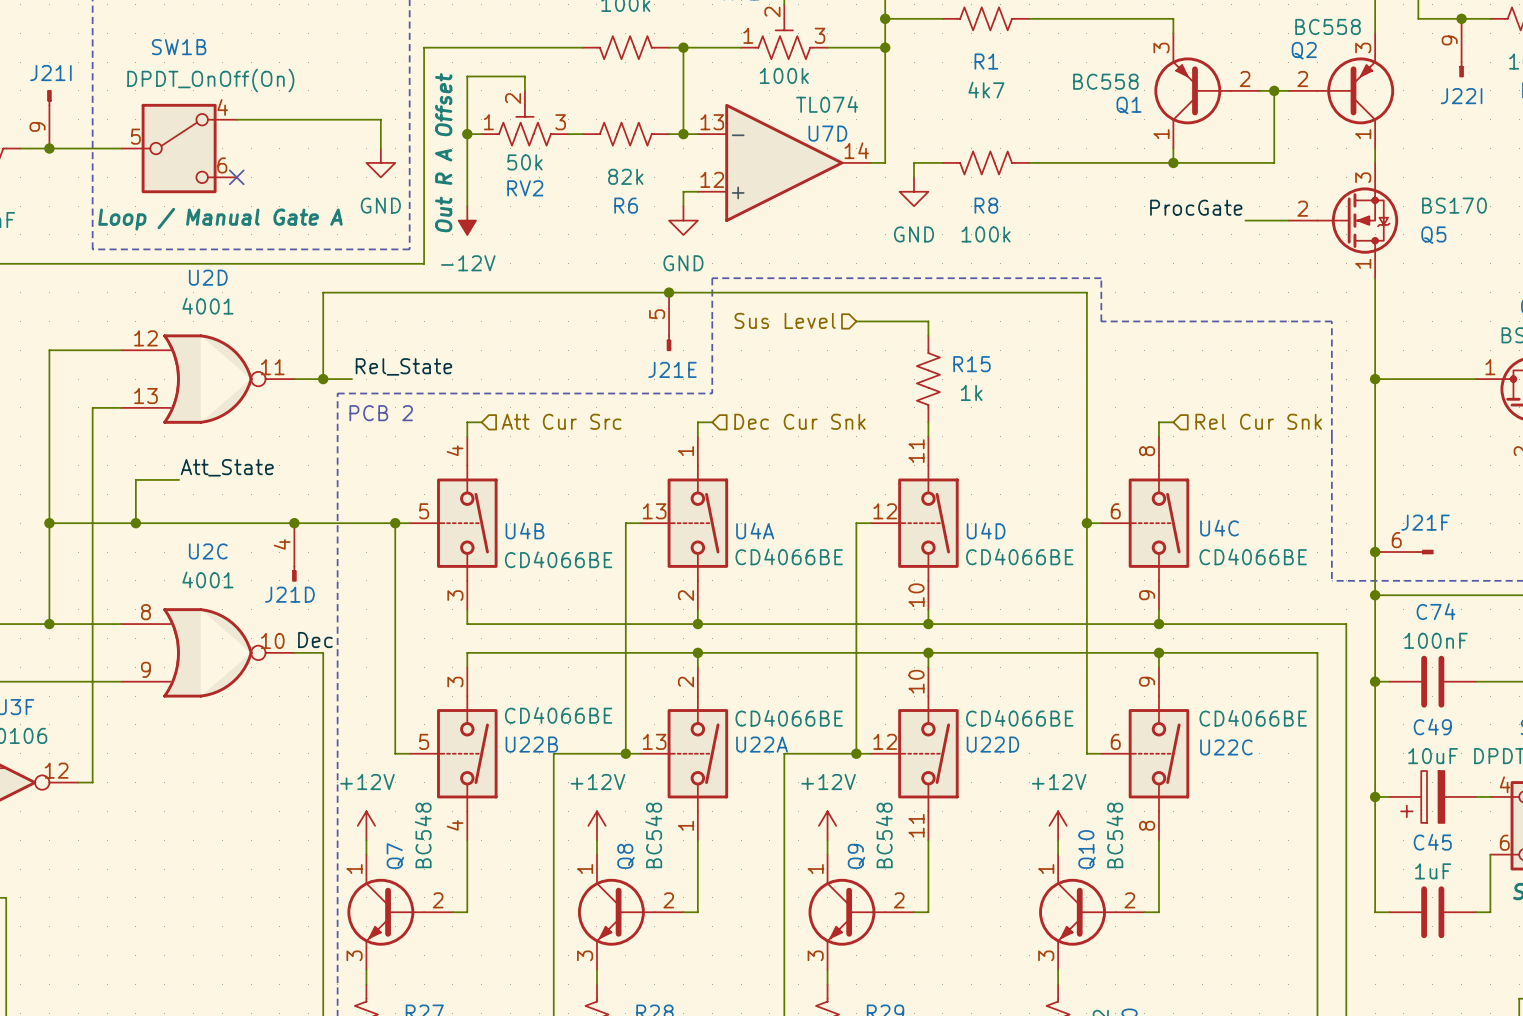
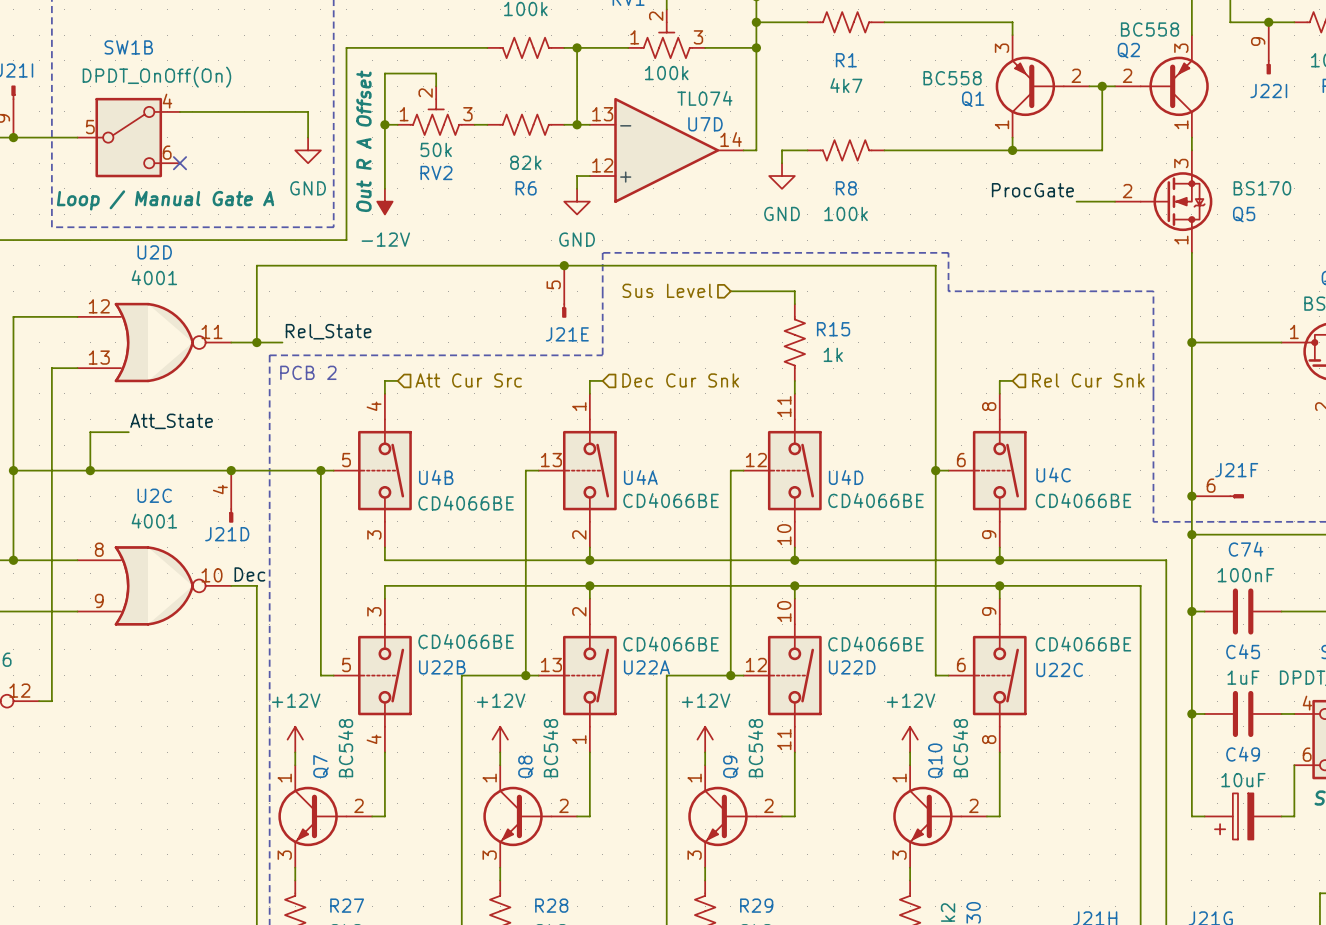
C49 position: (1432, 796) -> (1243, 816)
C45 position: (1432, 912) -> (1243, 713)

